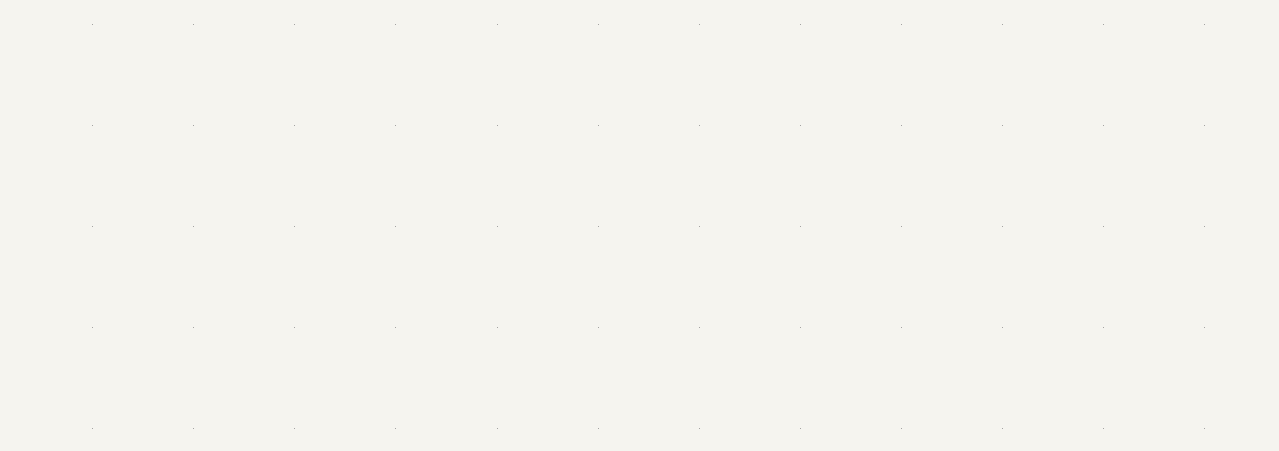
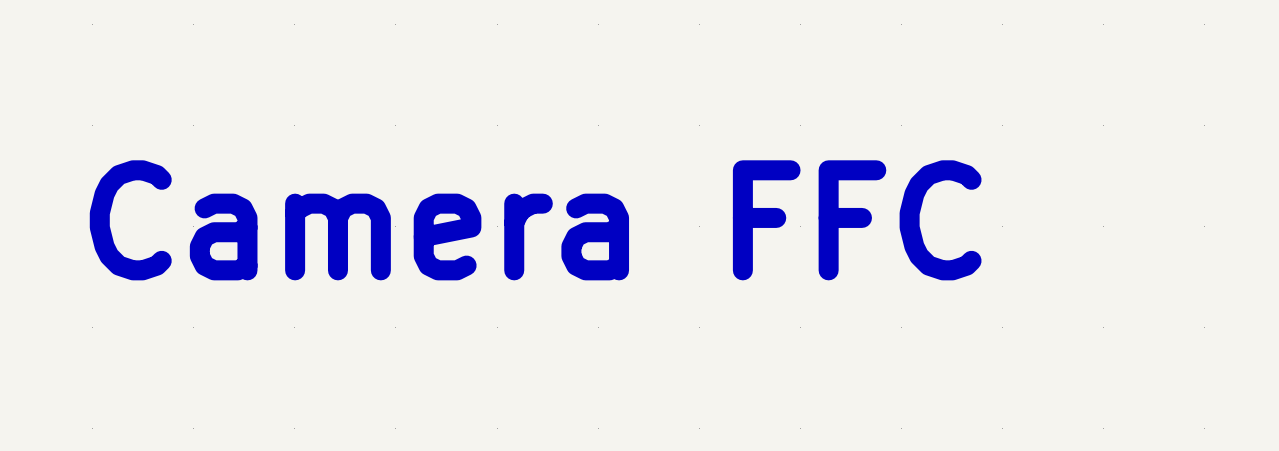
text: none -> Camera FFC (535, 220)

